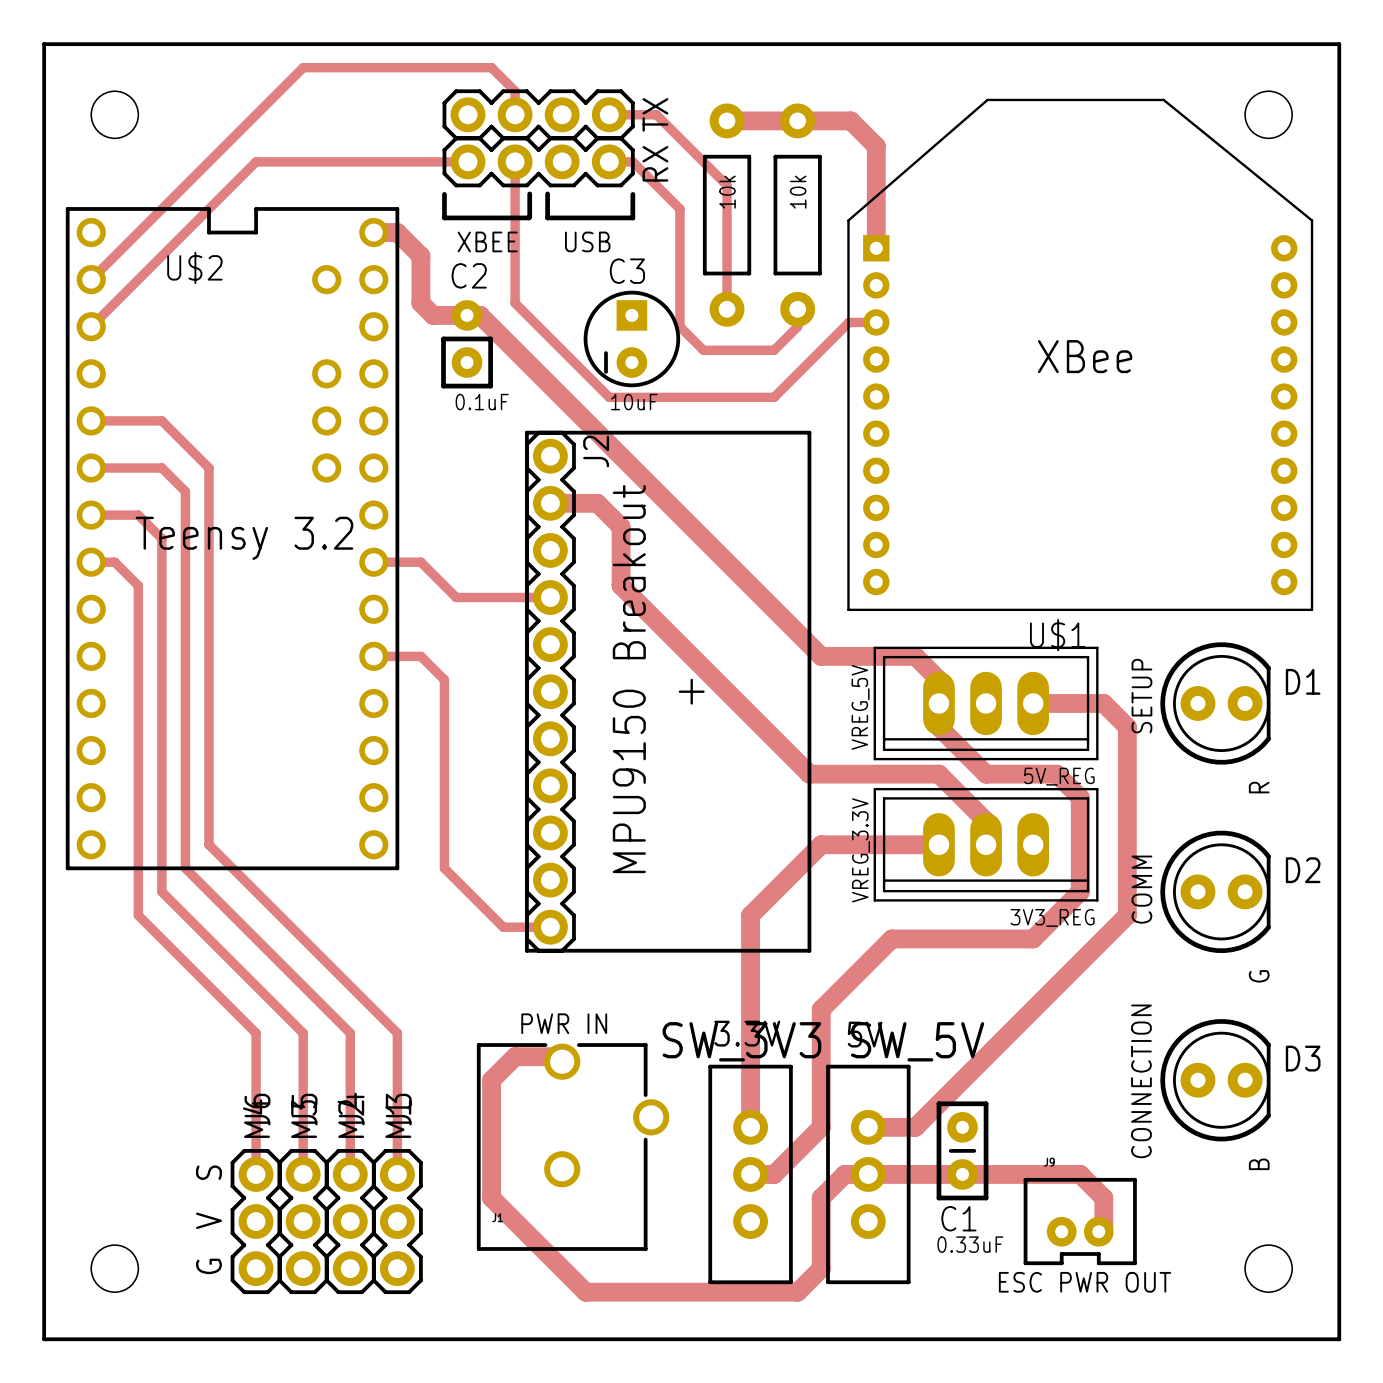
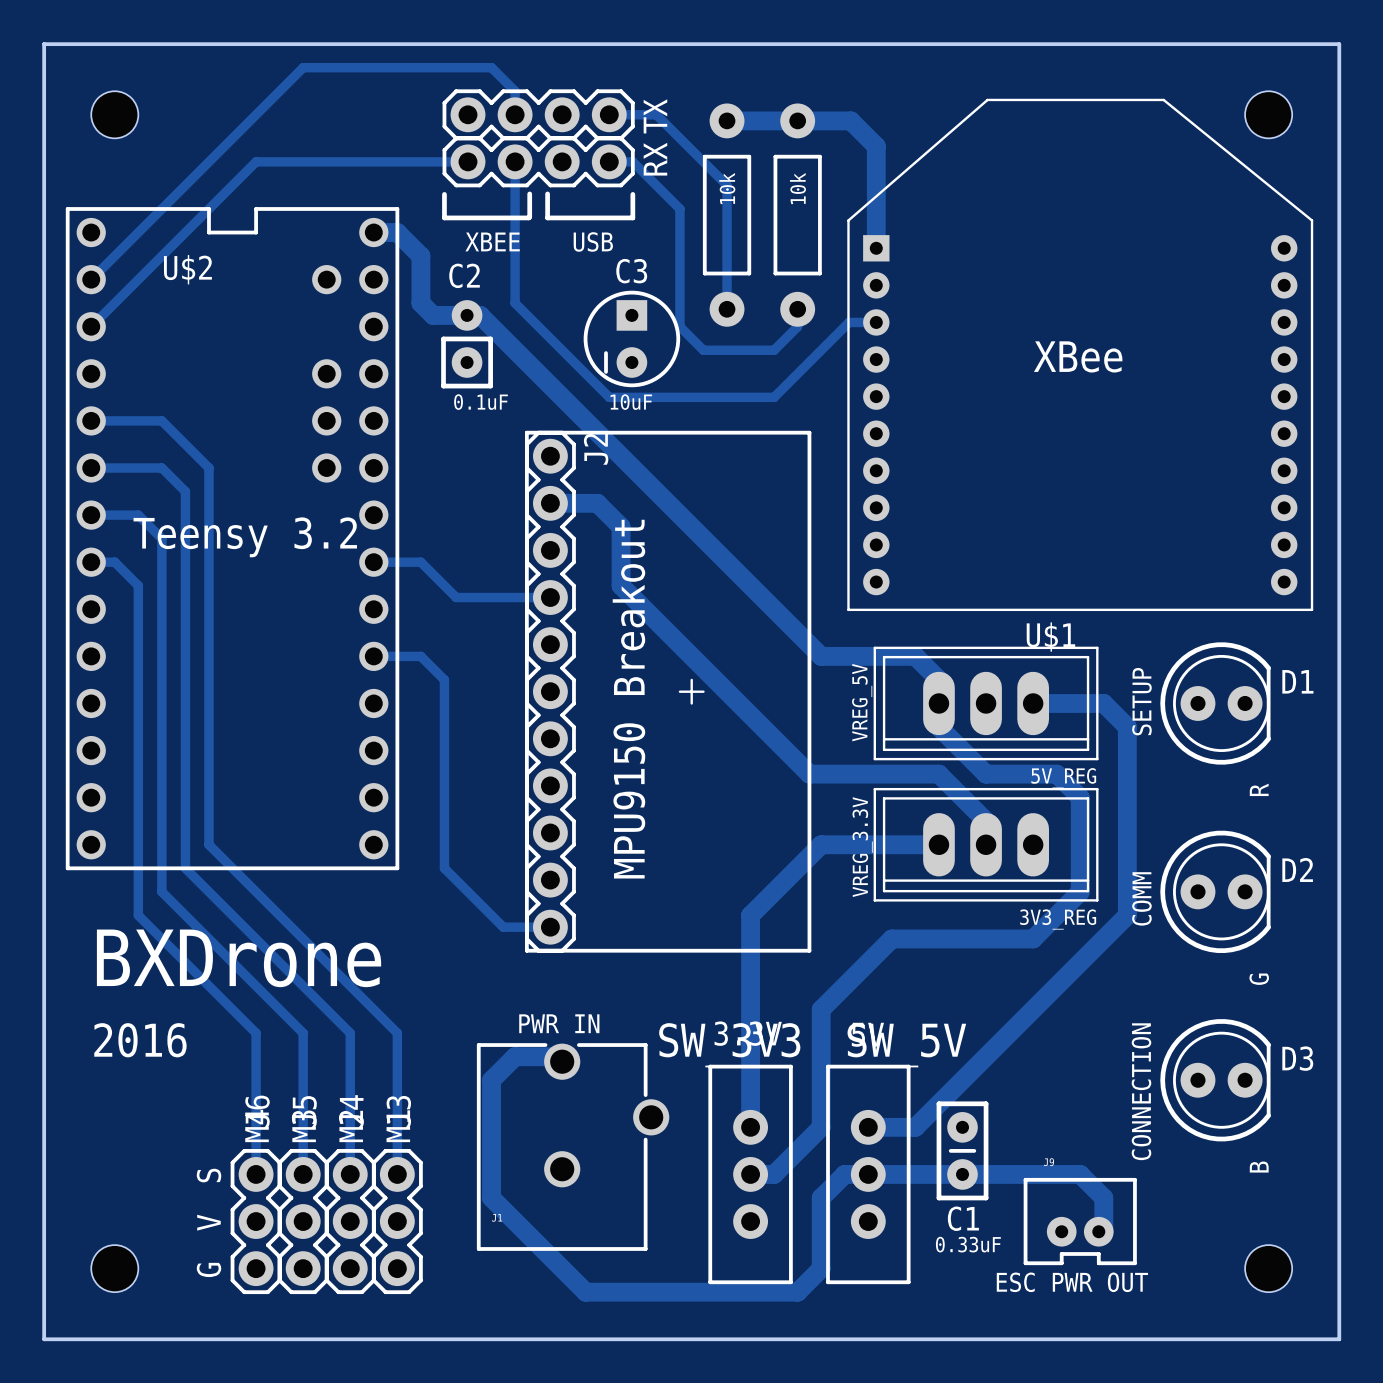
text: none -> BXDrone (239, 958)
text: none -> 2016 (140, 1040)

